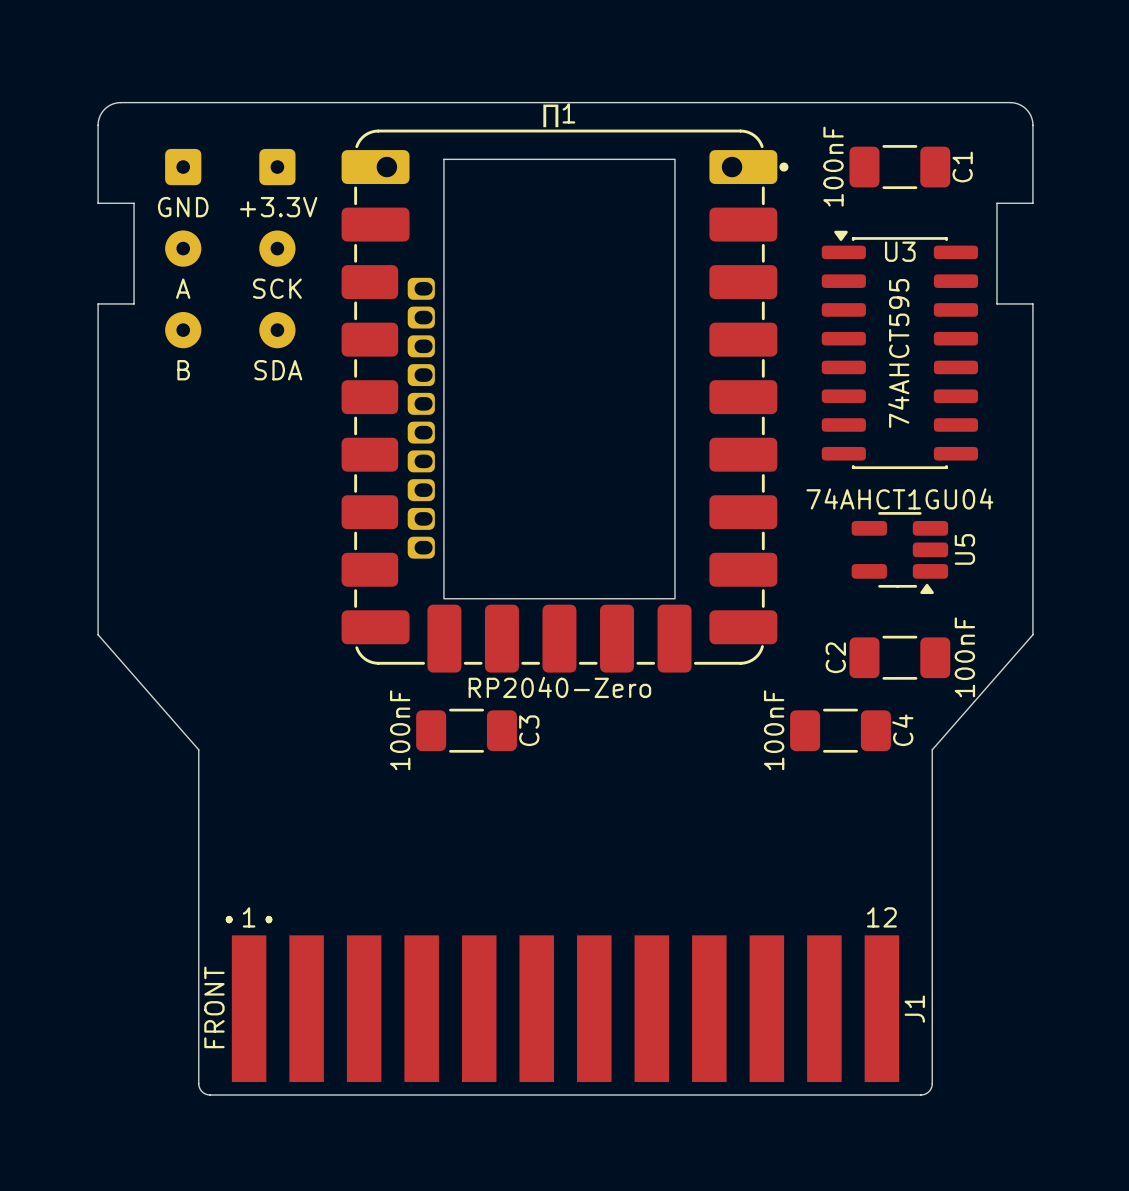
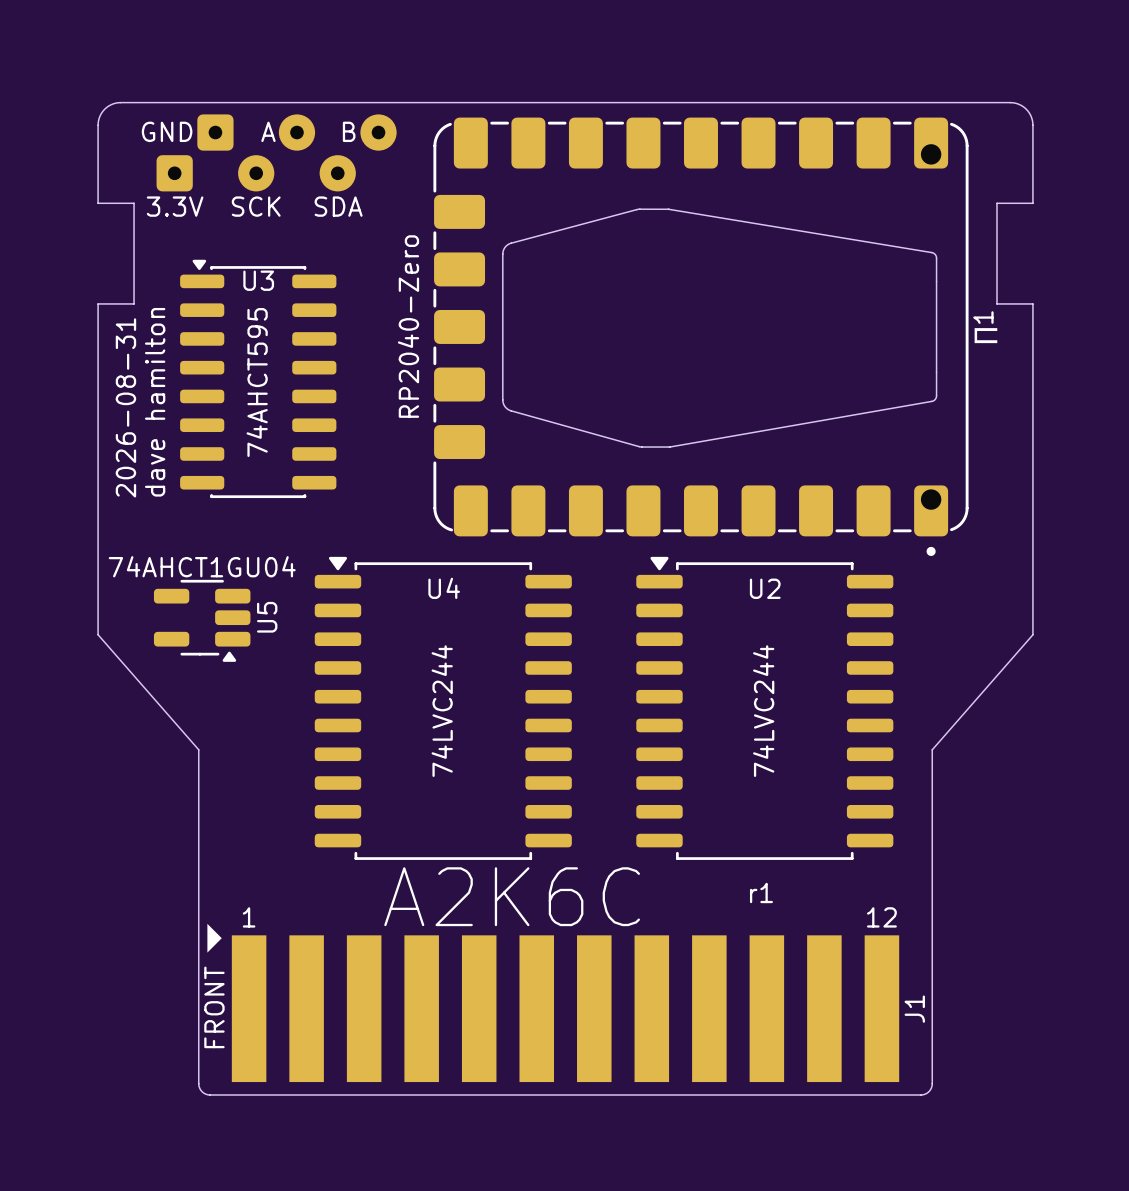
∏1 name position: ∏1 (558, 115) -> ∏1 (985, 327)
∏1 footprint: [341, 129, 789, 673] -> [433, 117, 969, 556]
C1: 100nF (899, 167) -> none
text: none -> 3.3V (175, 206)
text position: GND (183, 207) -> GND (167, 131)
text: +3.3V (278, 207) -> none
part rotation: 0° (183, 248) -> 90° counterclockwise (296, 132)
part position: (183, 248) -> (296, 132)
part side: top (277, 248) -> bottom (256, 173)
text position: A (183, 288) -> A (268, 131)
text position: SCK (277, 288) -> SCK (256, 206)
U3 position: (899, 349) -> (258, 378)
text position: B (183, 370) -> B (349, 131)
text position: SDA (278, 370) -> SDA (338, 206)
text: none -> dave hamilton (155, 402)
text: none -> 2026-08-31 (125, 407)
U5 position: (899, 553) -> (202, 620)
C2: 100nF (899, 657) -> none
∏1 value position: RP2040-Zero (559, 687) -> RP2040-Zero (408, 326)
U4: none -> 74LVC244 (443, 708)
U2: none -> 74LVC244 (764, 708)
C3: 100nF (466, 730) -> none
C4: 100nF (840, 730) -> none
text: none -> r1 (761, 892)
text: none -> A2K6C (512, 896)
text: •1• (249, 917) -> 1 (249, 917)
drawing: none -> [207, 923, 222, 953]

